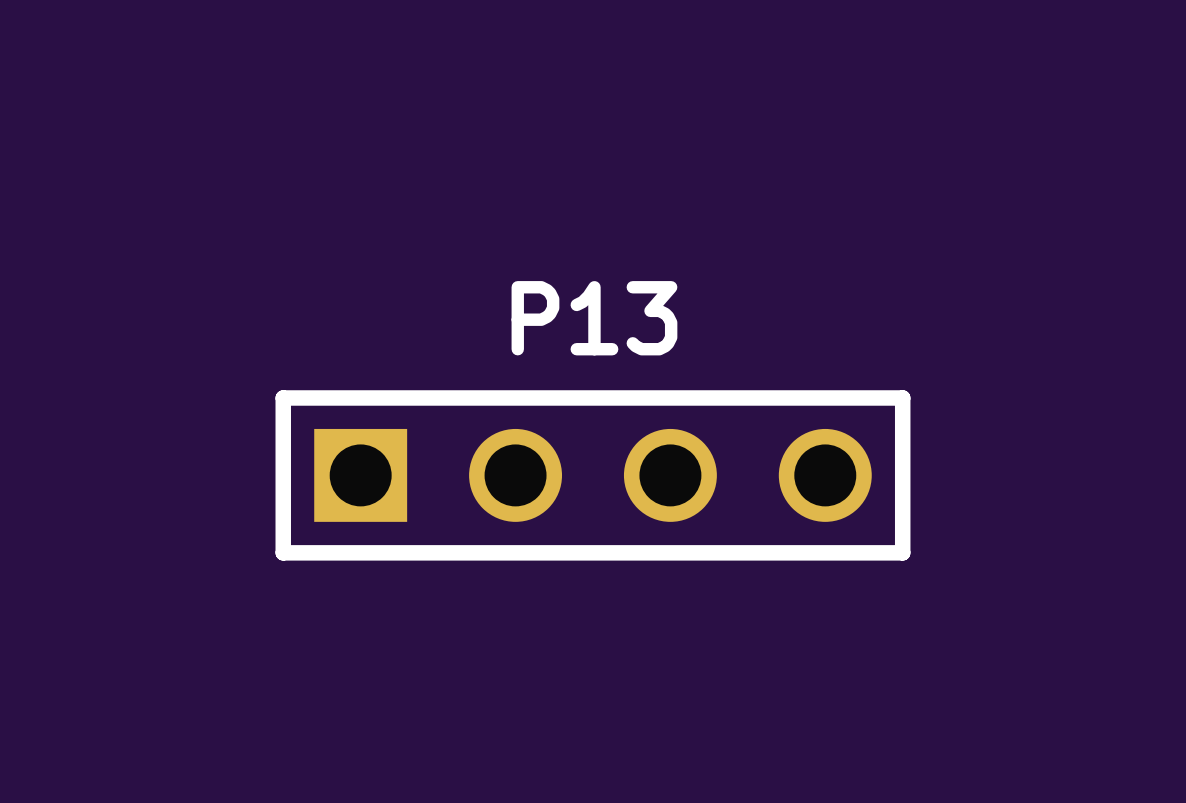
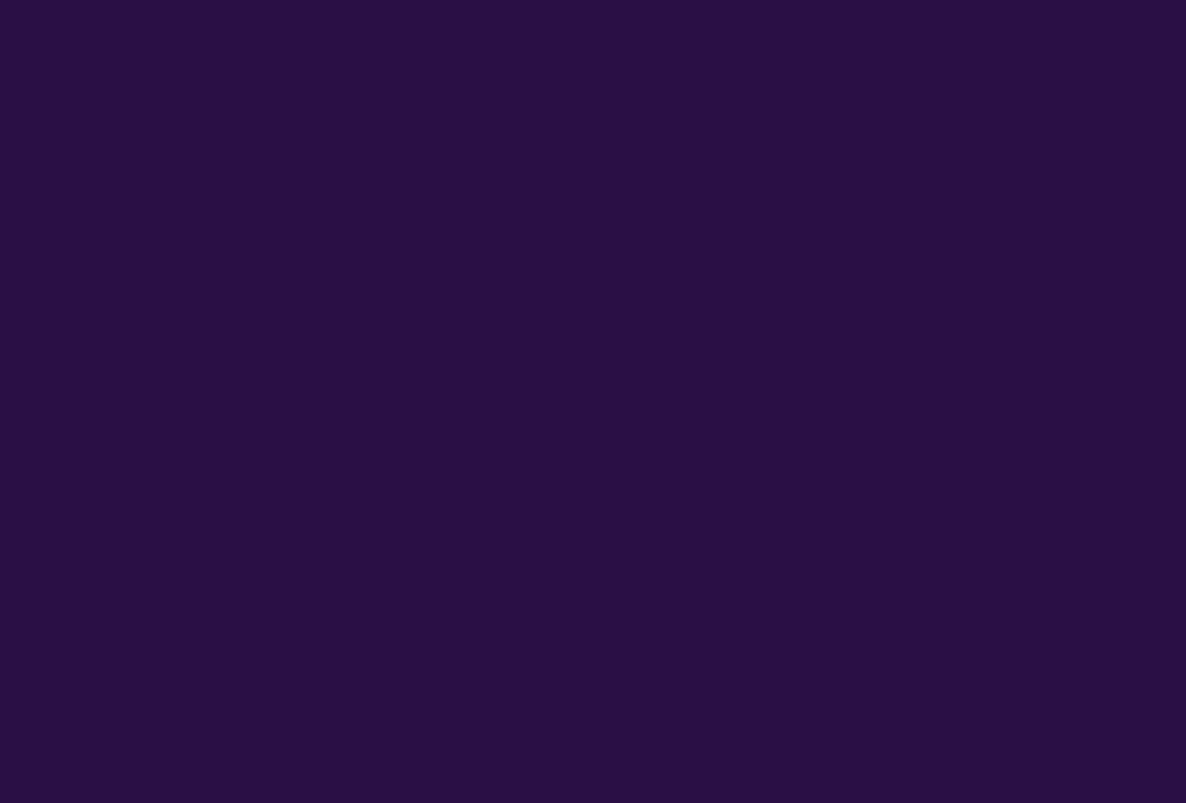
P13: (592, 475) -> none

